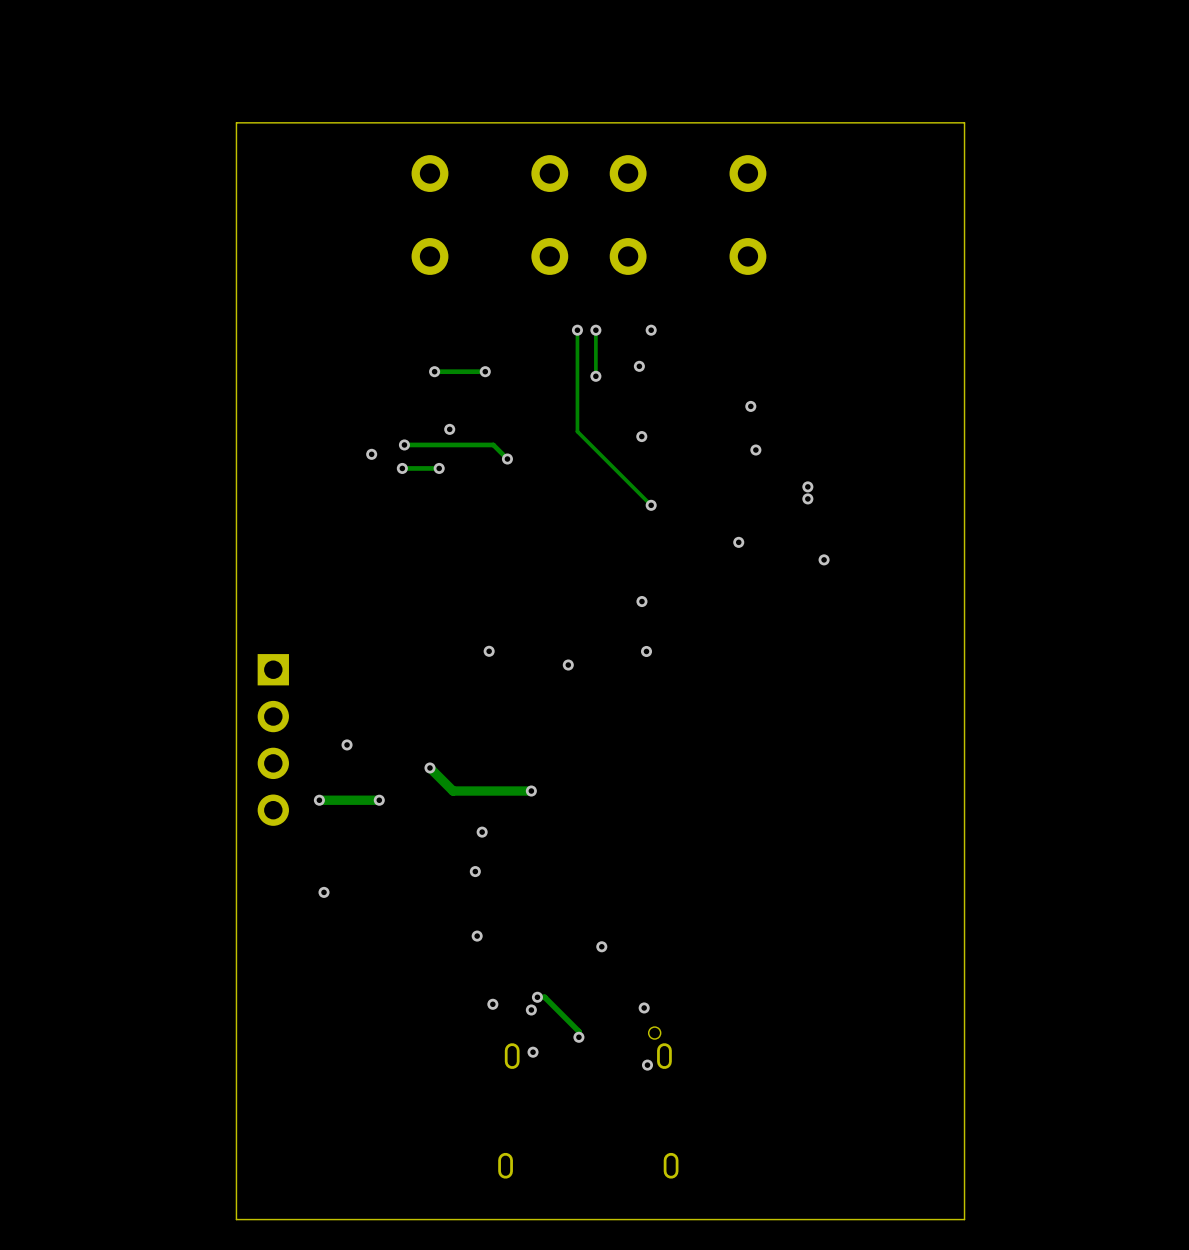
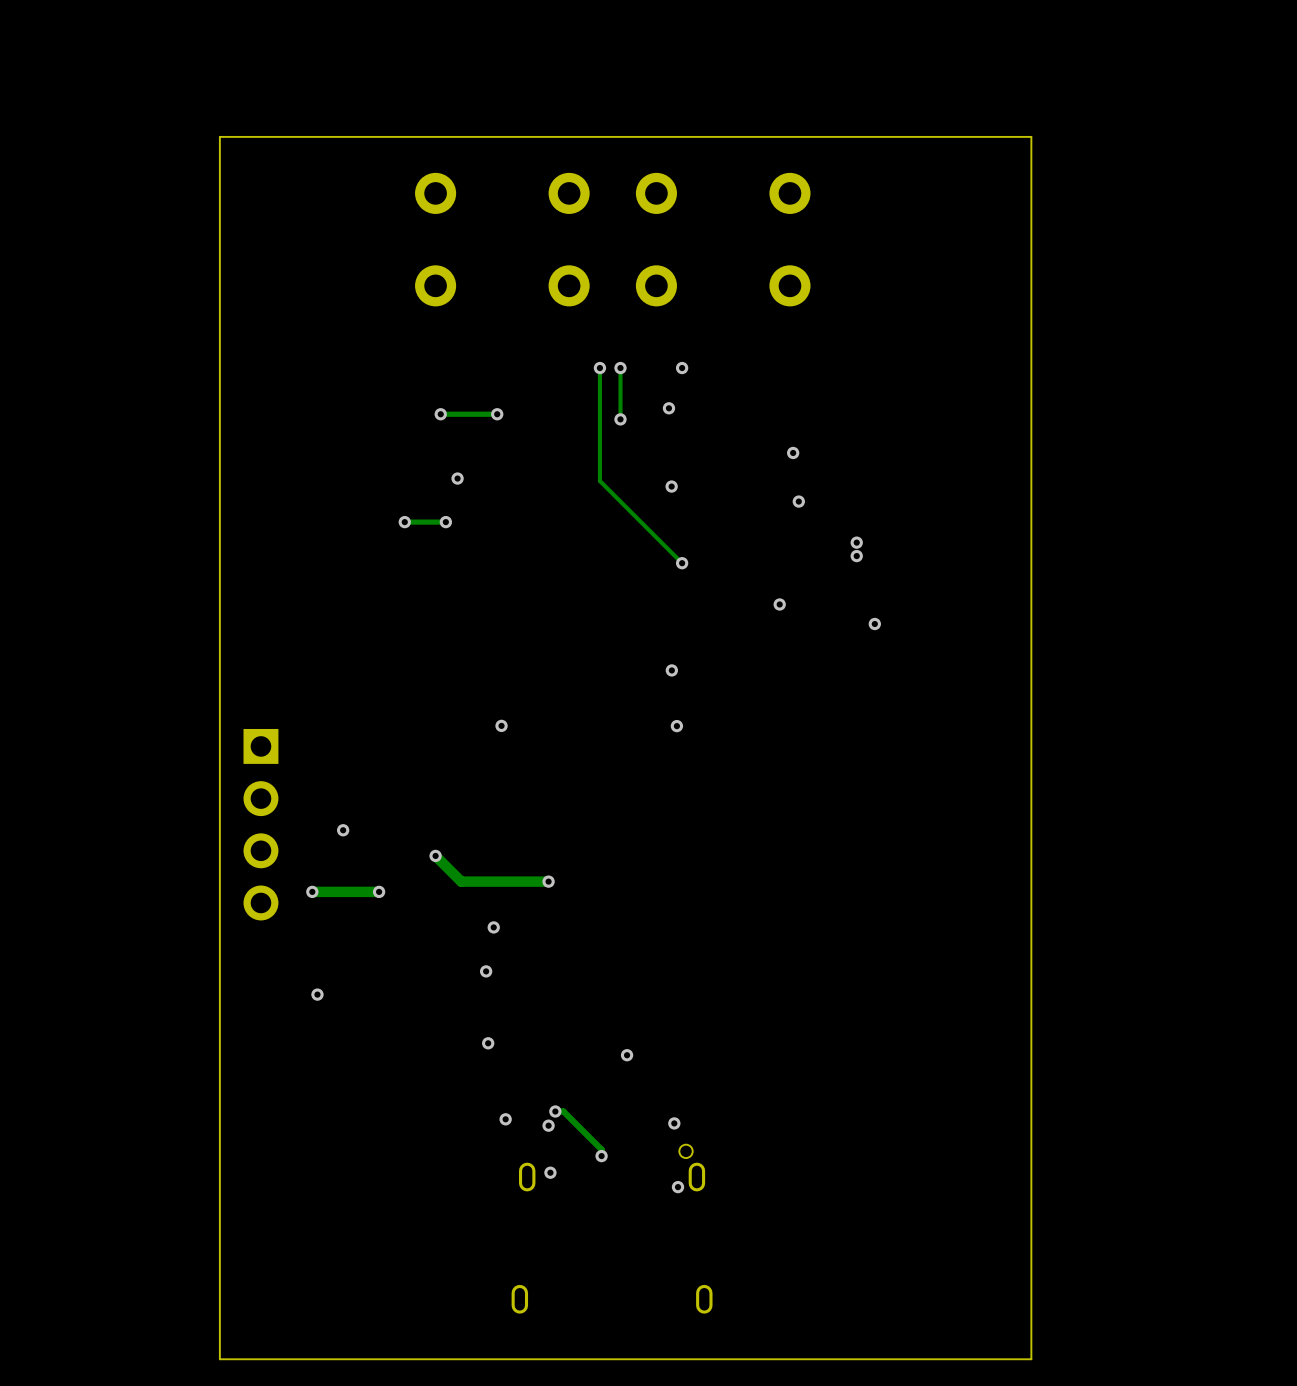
track: (404, 444) (493, 444) (507, 459) -> none
via: (404, 444) -> none
via: (371, 454) -> none
via: (507, 459) -> none
via: (568, 665) -> none

